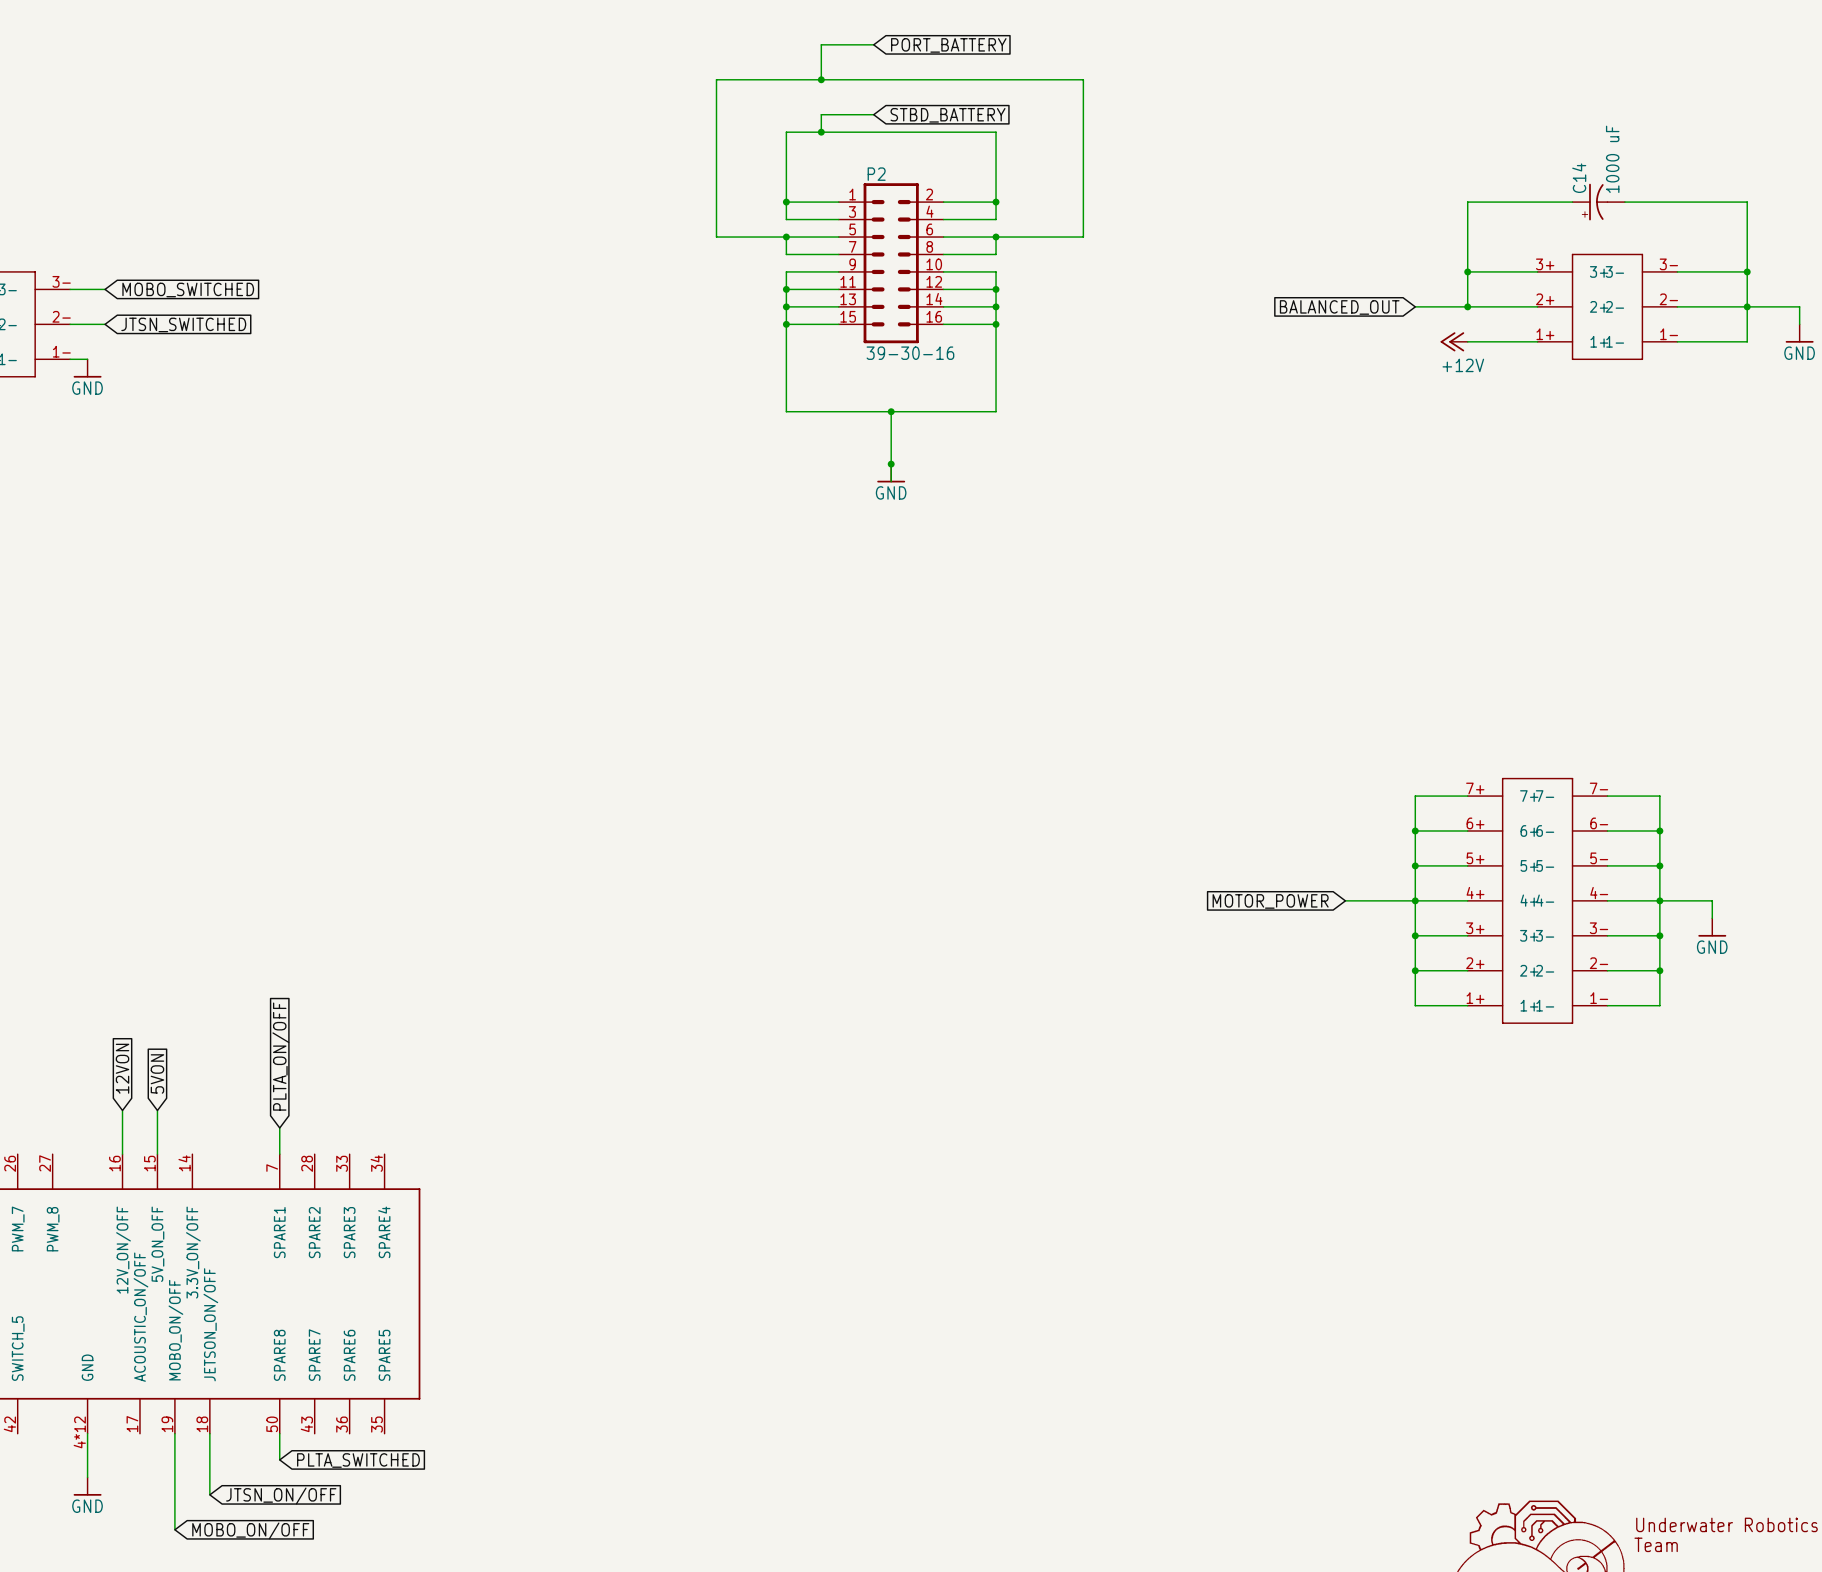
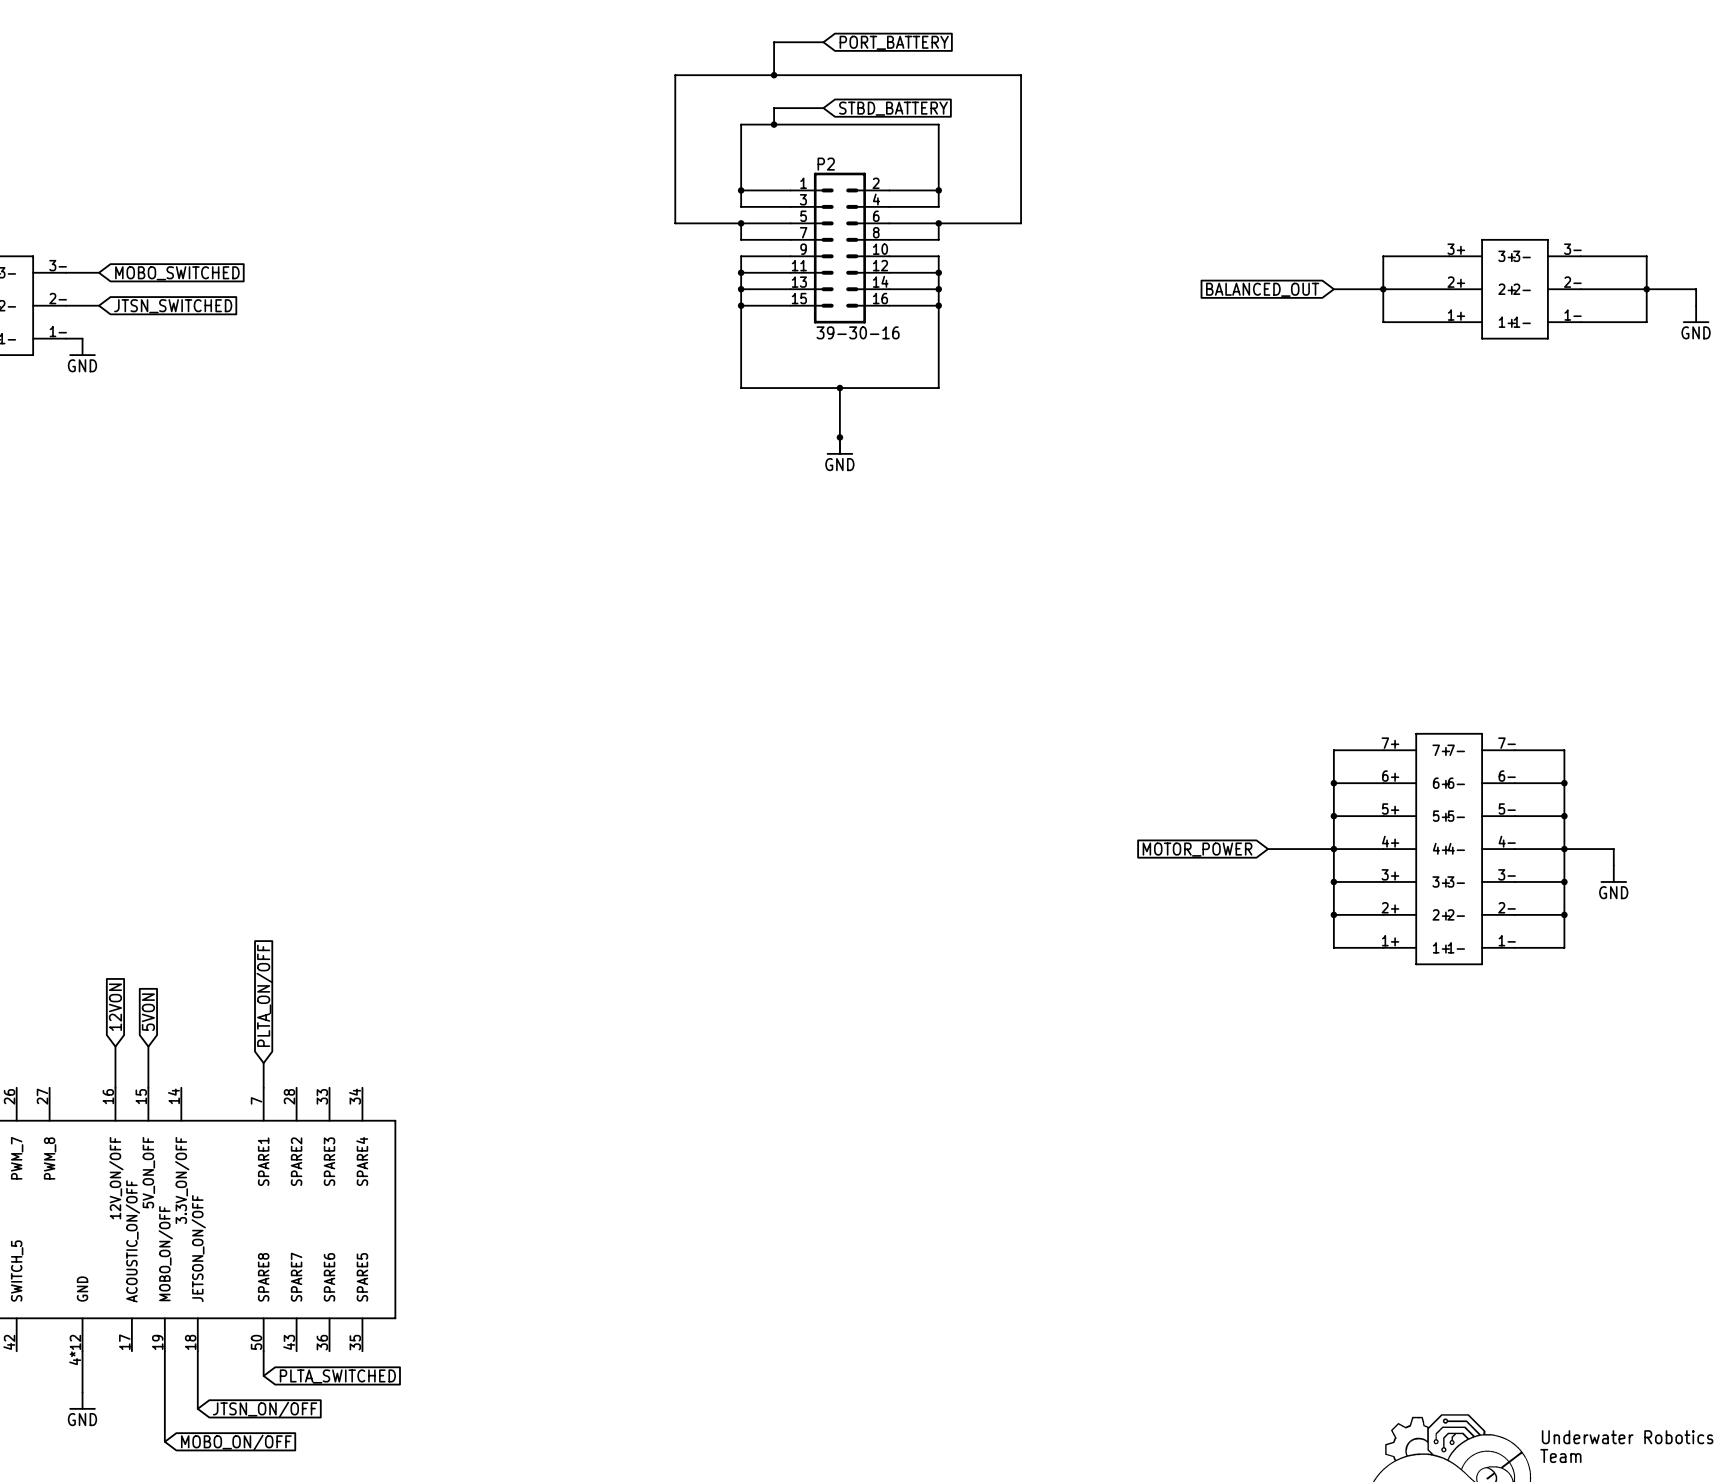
wire: (1572, 202) (1467, 202) (1467, 271) -> none
C14: 1000 uF (1598, 202) -> none
wire: (1624, 202) (1747, 202) (1747, 271) -> none
junction: (1467, 271) -> none
junction: (1747, 271) -> none
wire: none -> (1383, 289) (1383, 322)
power symbol: +12V (1454, 341) -> none

